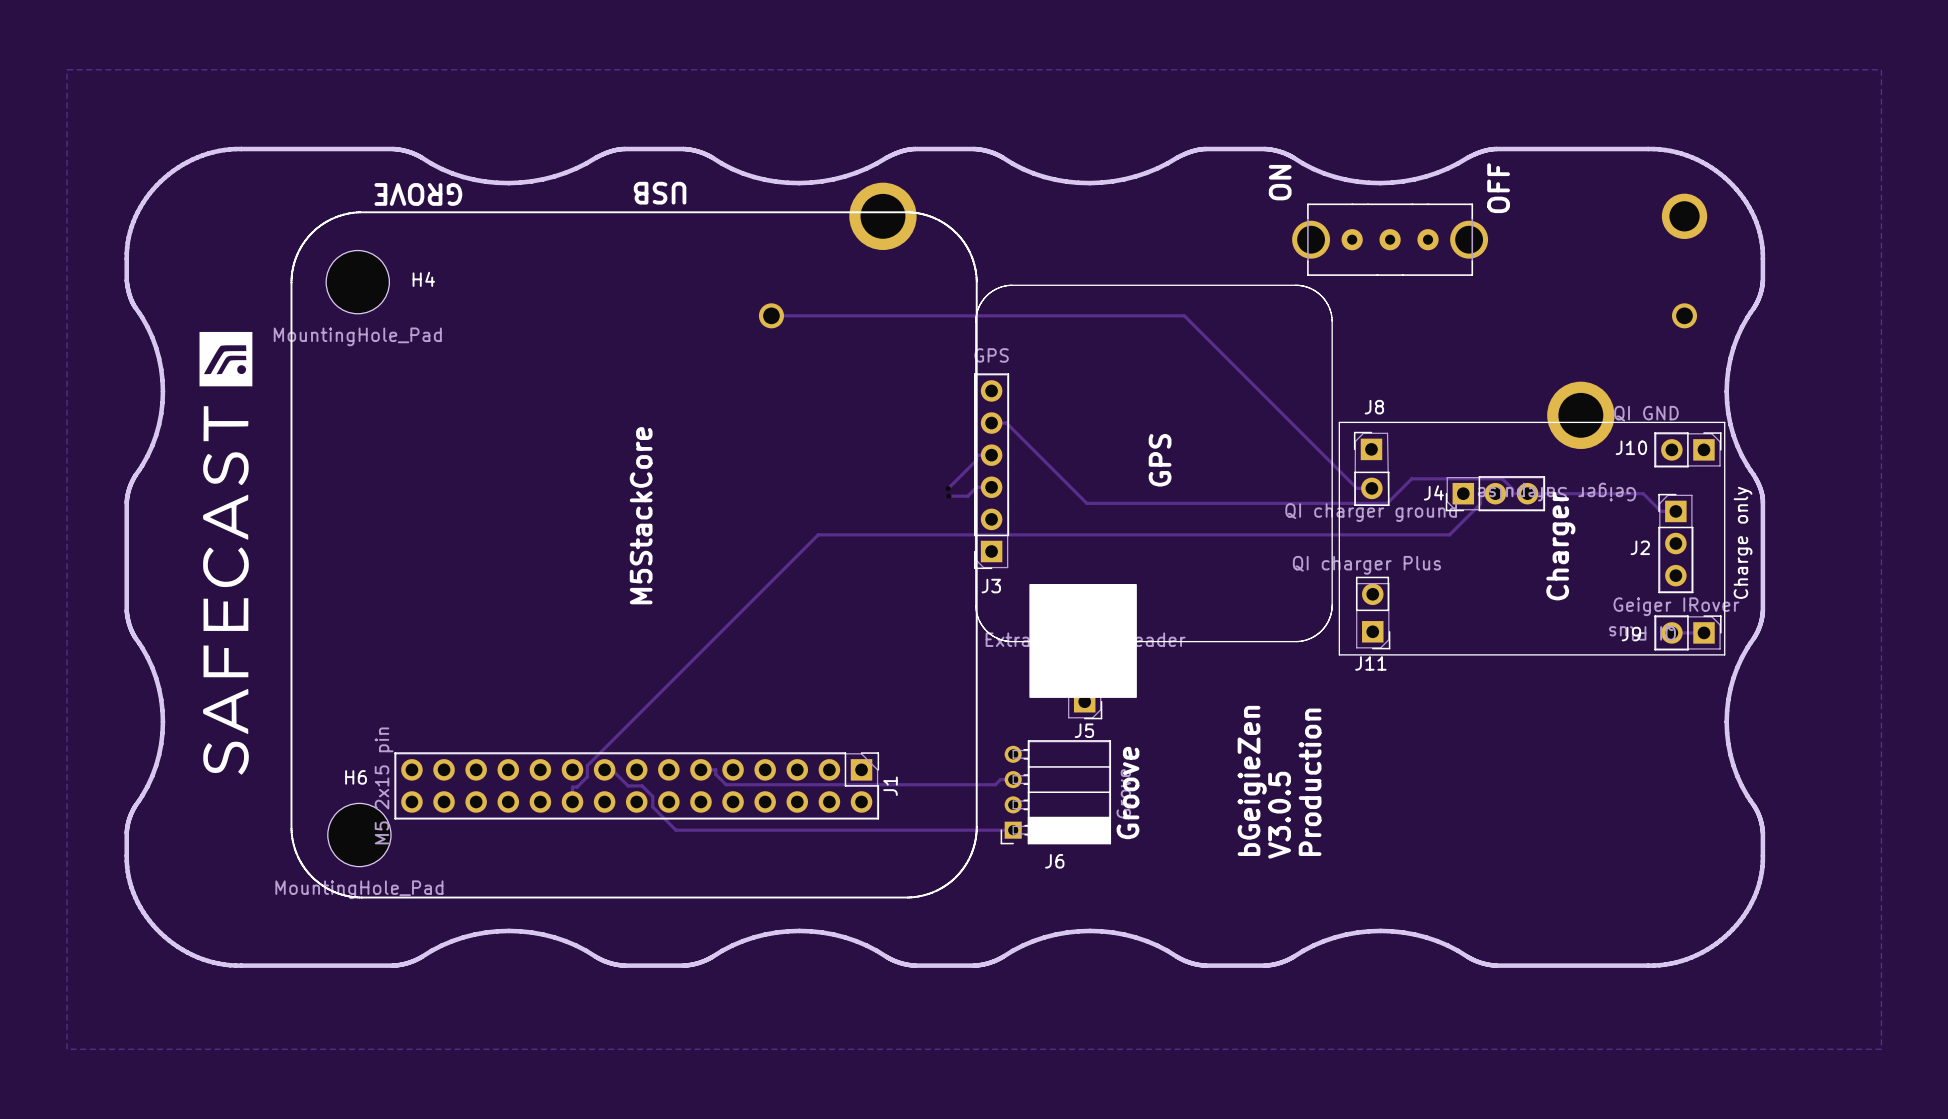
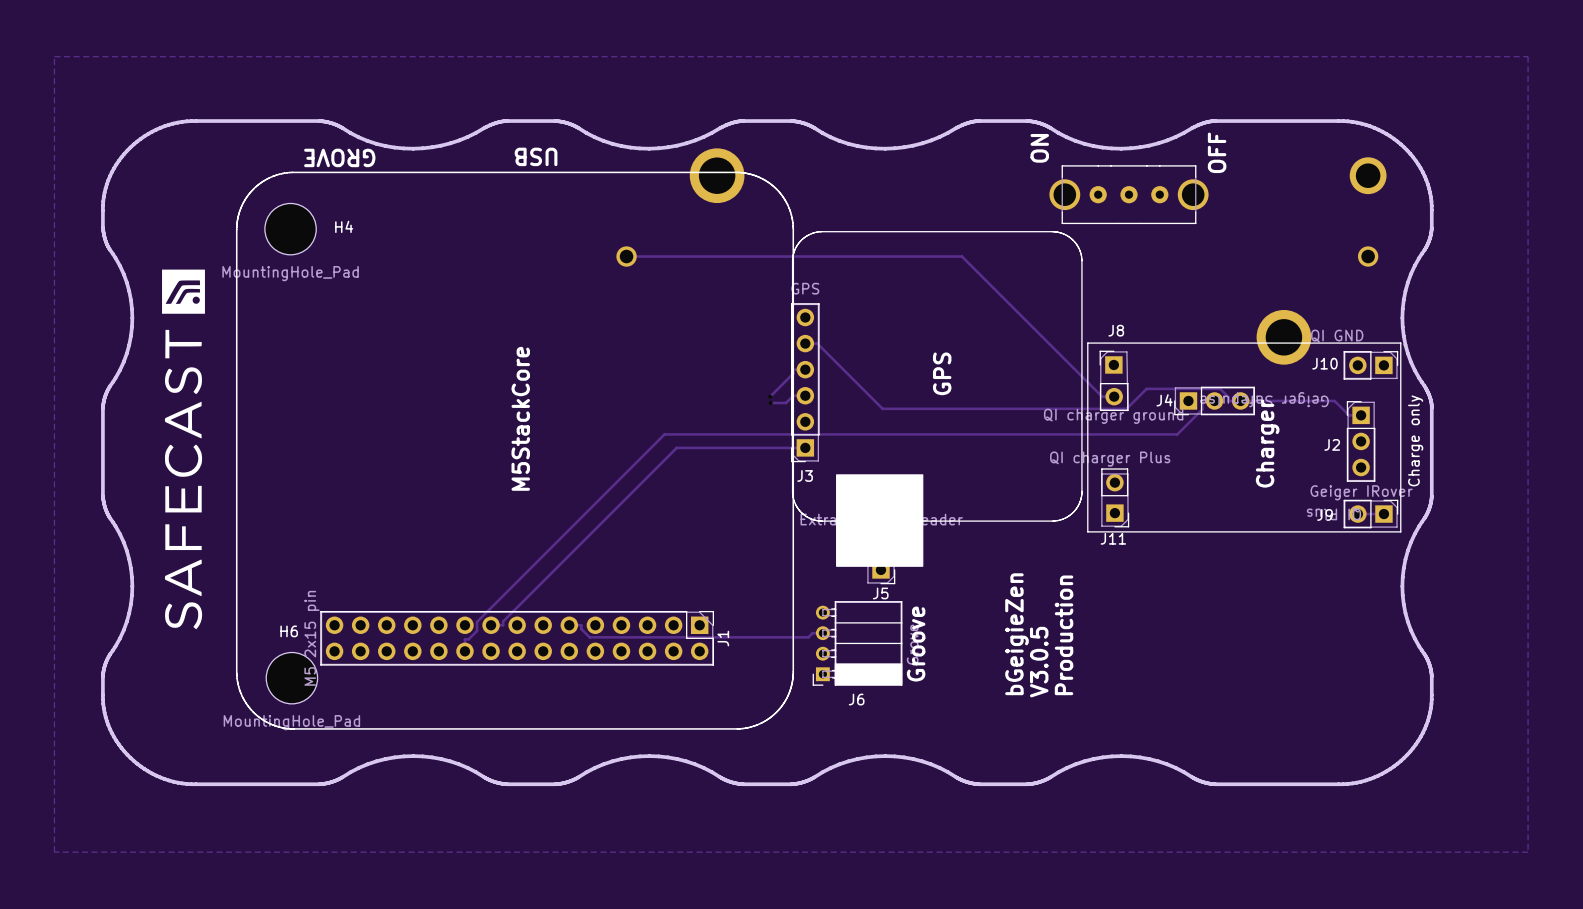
track: (612, 769) (628, 785) (642, 785) (652, 796) (652, 807) (675, 830) (1013, 830) -> (497, 625) (503, 625) (503, 621) (676, 447) (805, 447)

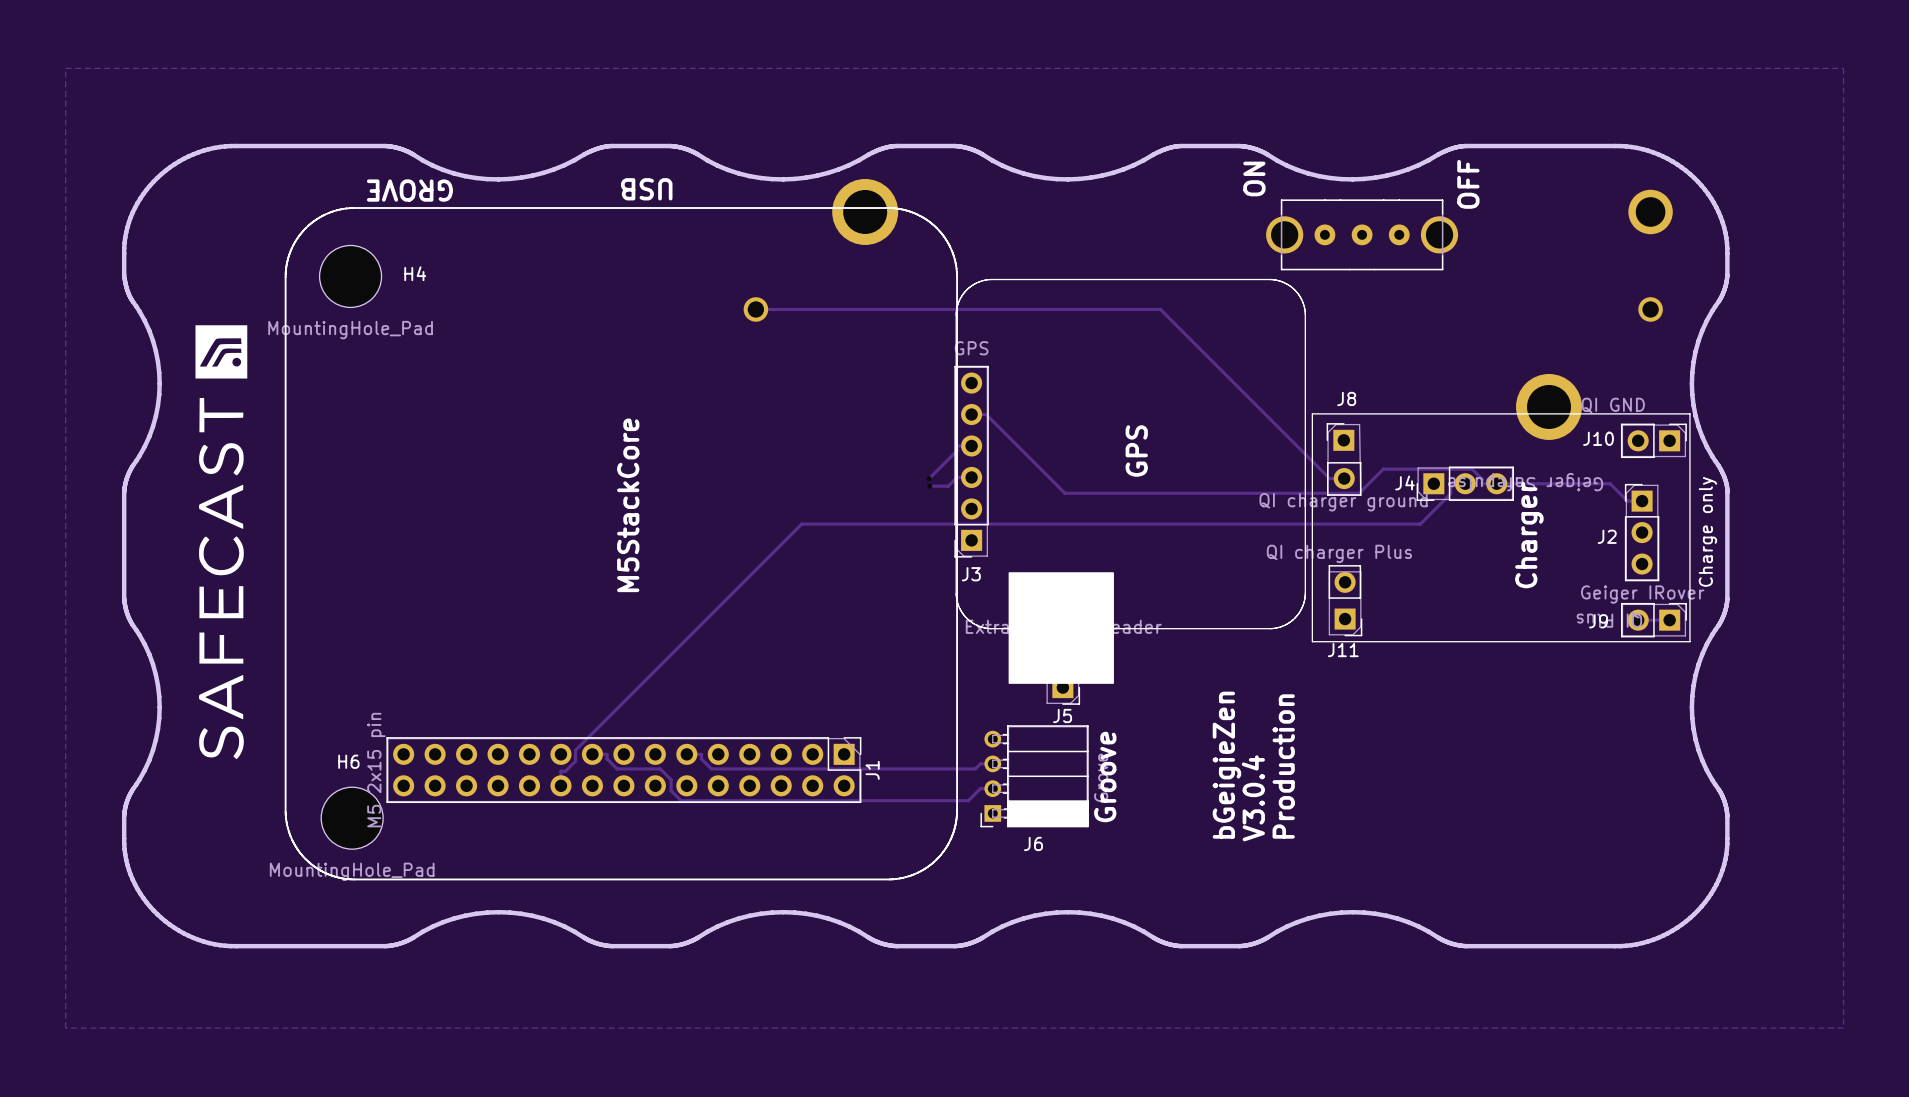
track: (805, 447) (676, 447) (503, 621) (503, 625) -> (992, 788) (980, 788) (968, 800) (681, 800) (671, 790) (671, 779) (660, 768) (617, 768) (607, 758) (607, 754)
text: V3.0.5 (1039, 662) -> V3.0.4 (1253, 798)

